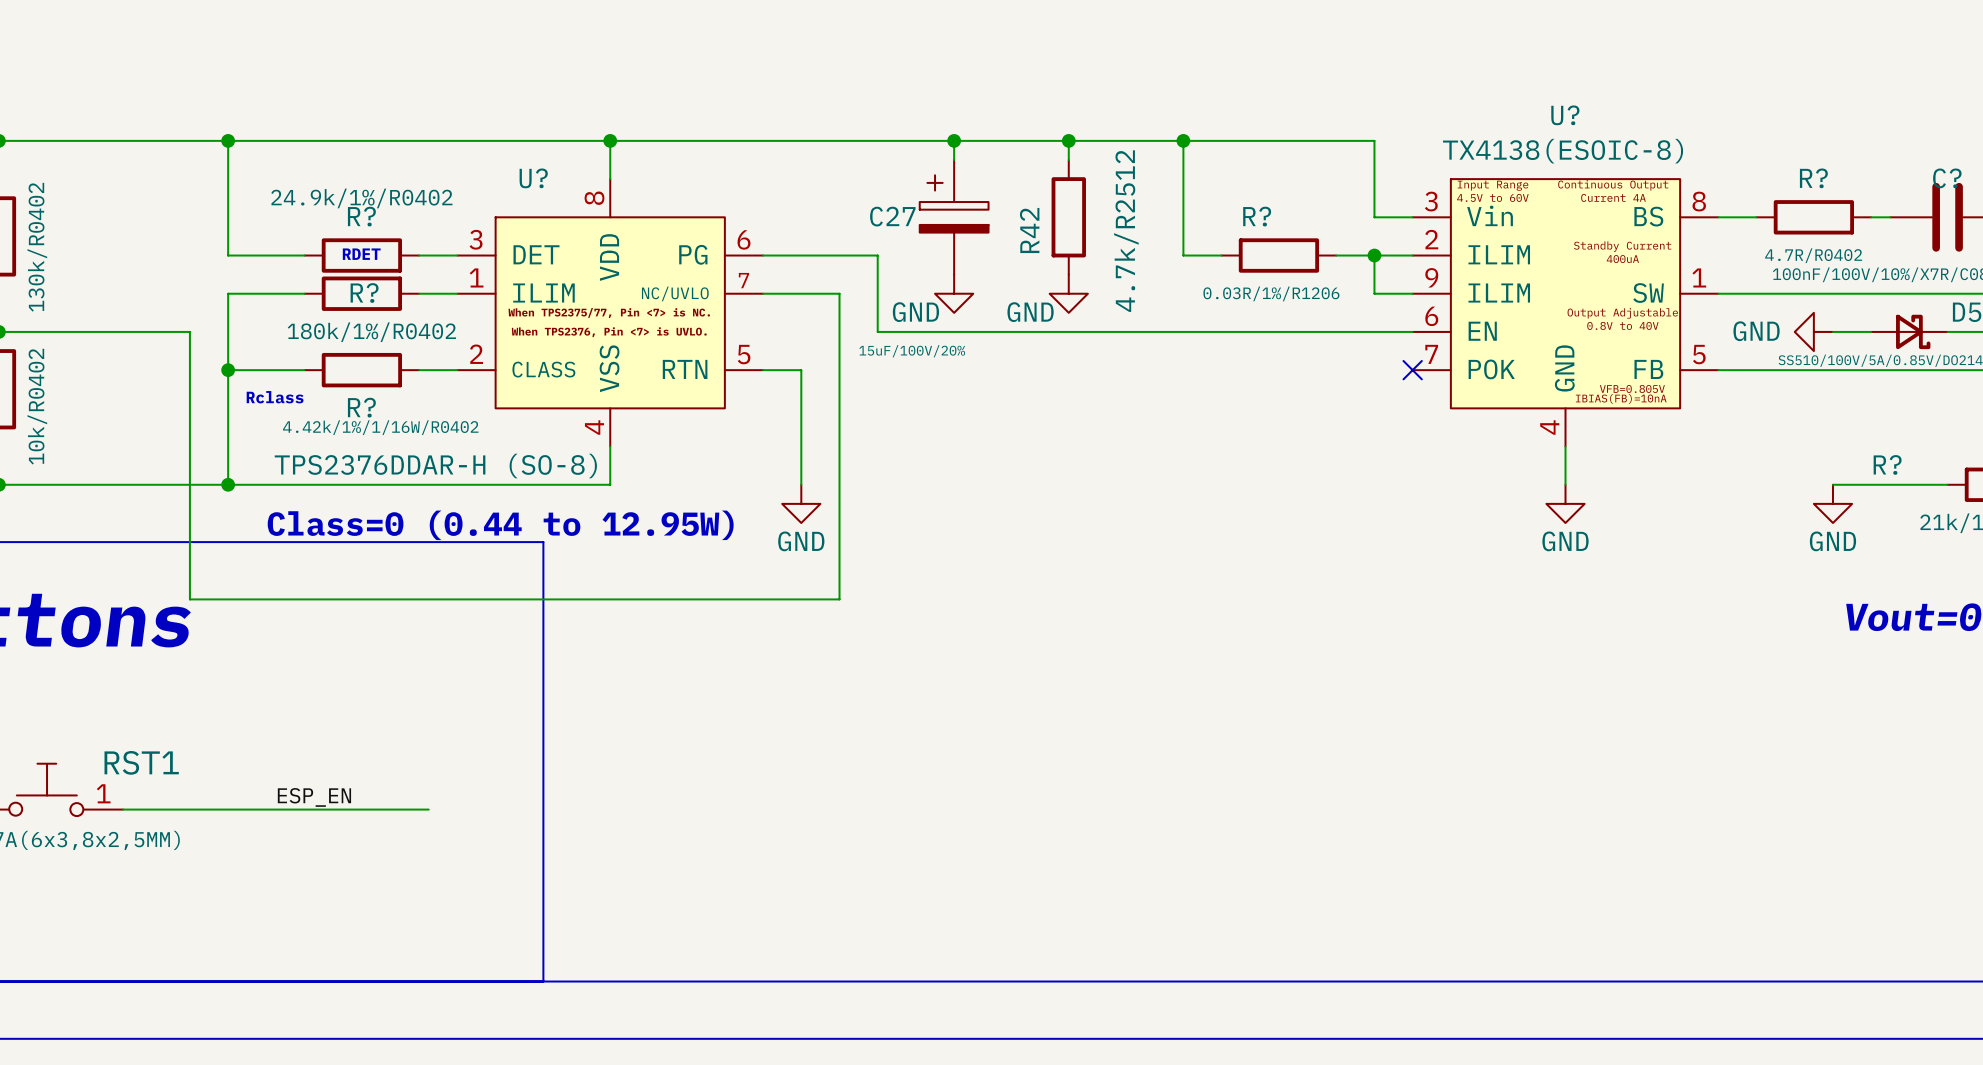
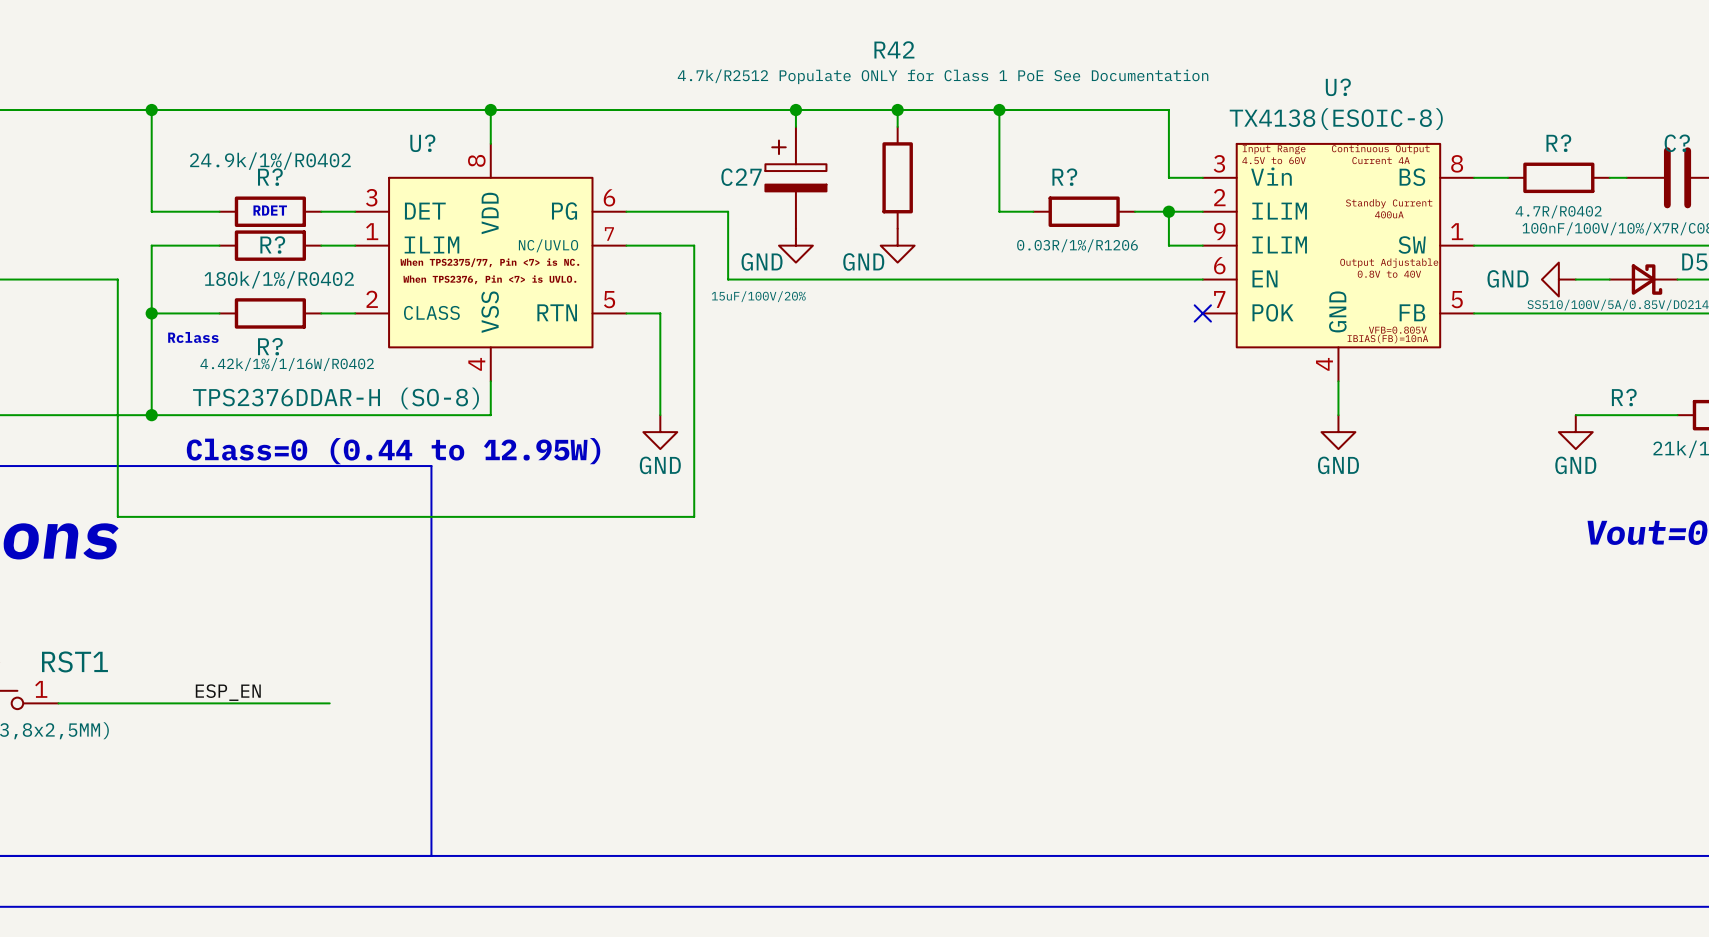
R42 name rotation: 0° (1029, 230) -> 90° clockwise (894, 49)
R42 name position: R42 (1029, 230) -> R42 (894, 49)
R42 value: 4.7k/R2512 (1126, 231) -> 4.7k/R2512 Populate ONLY for Class 1 PoE See Documentation (943, 76)

